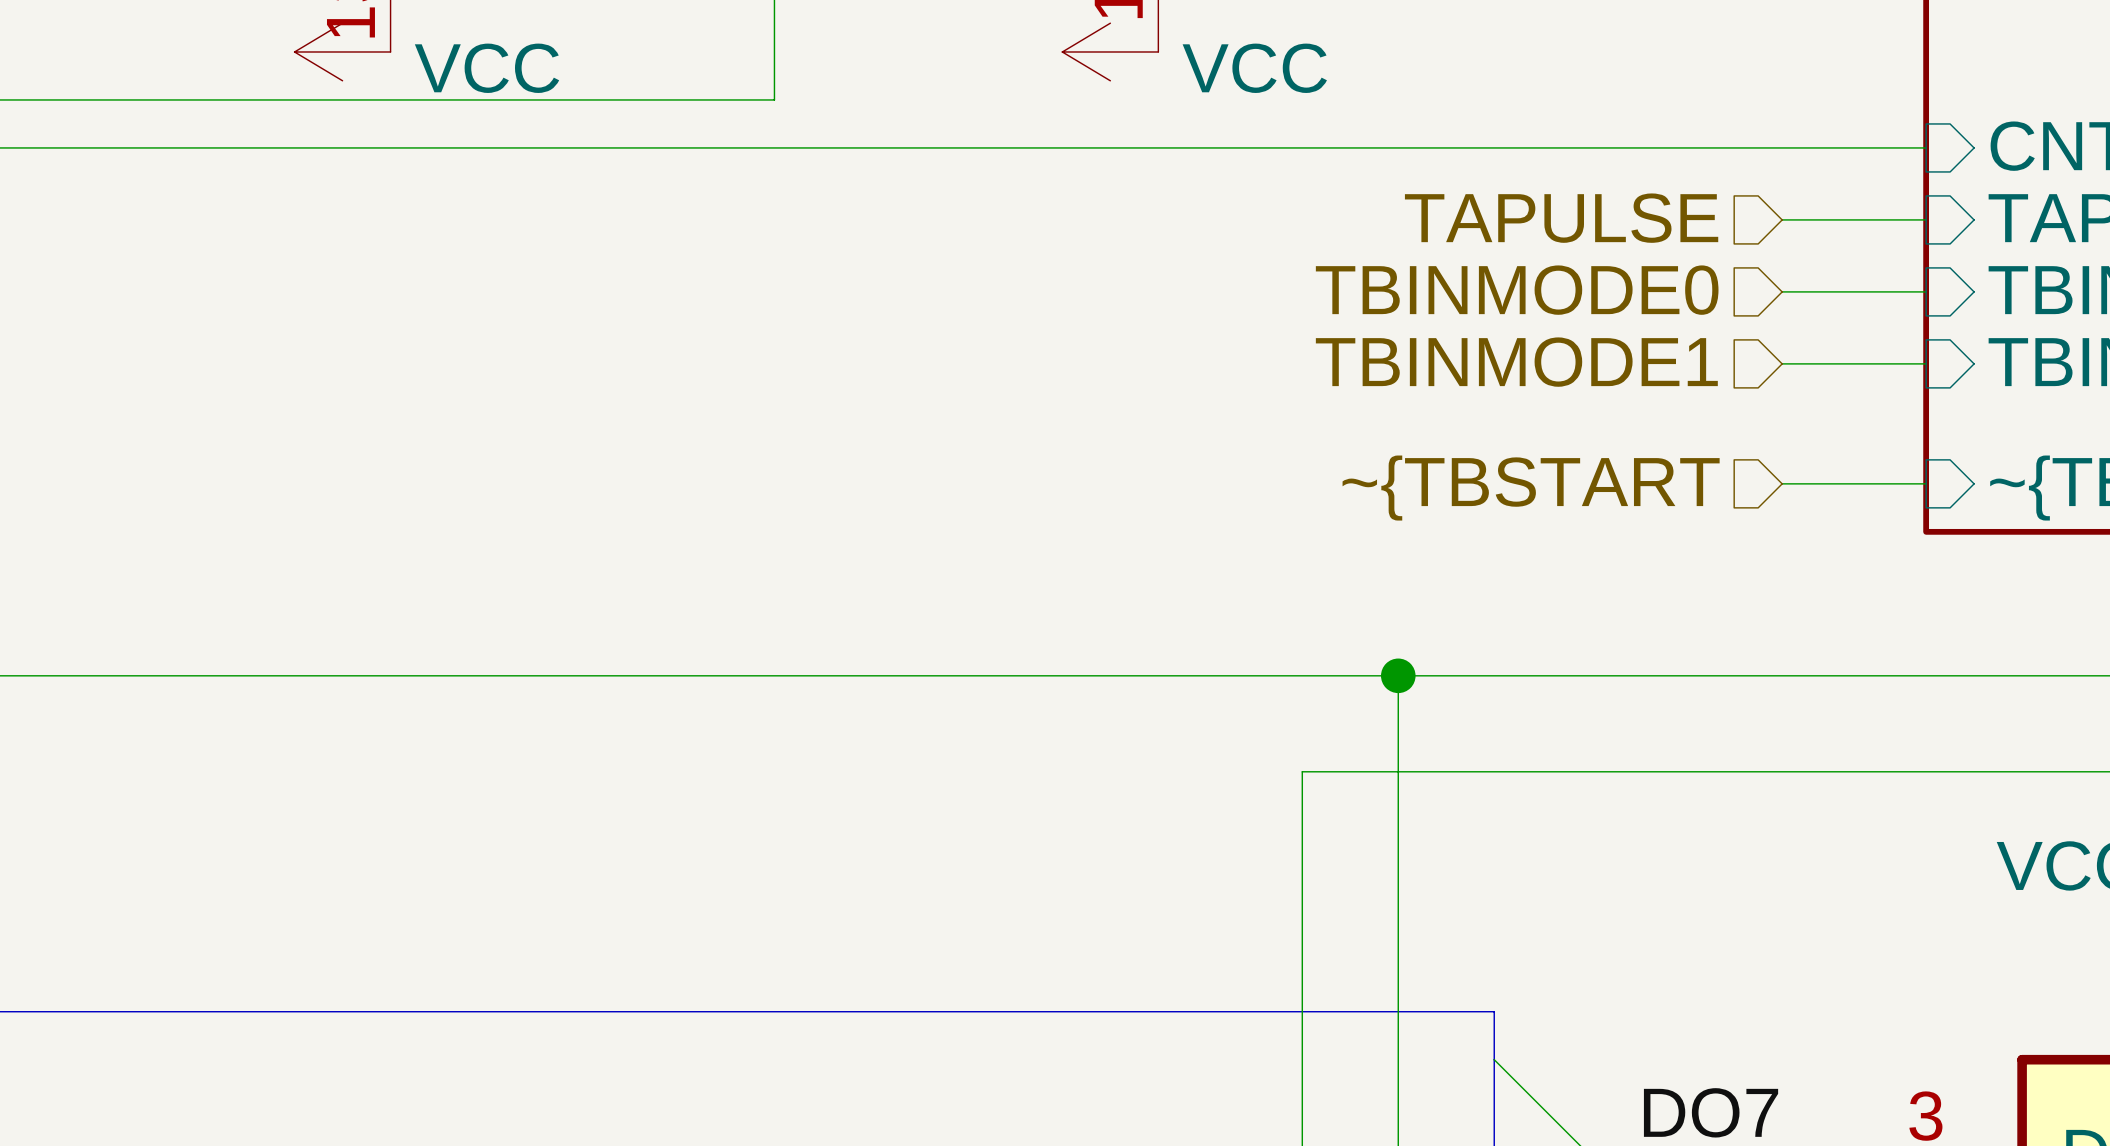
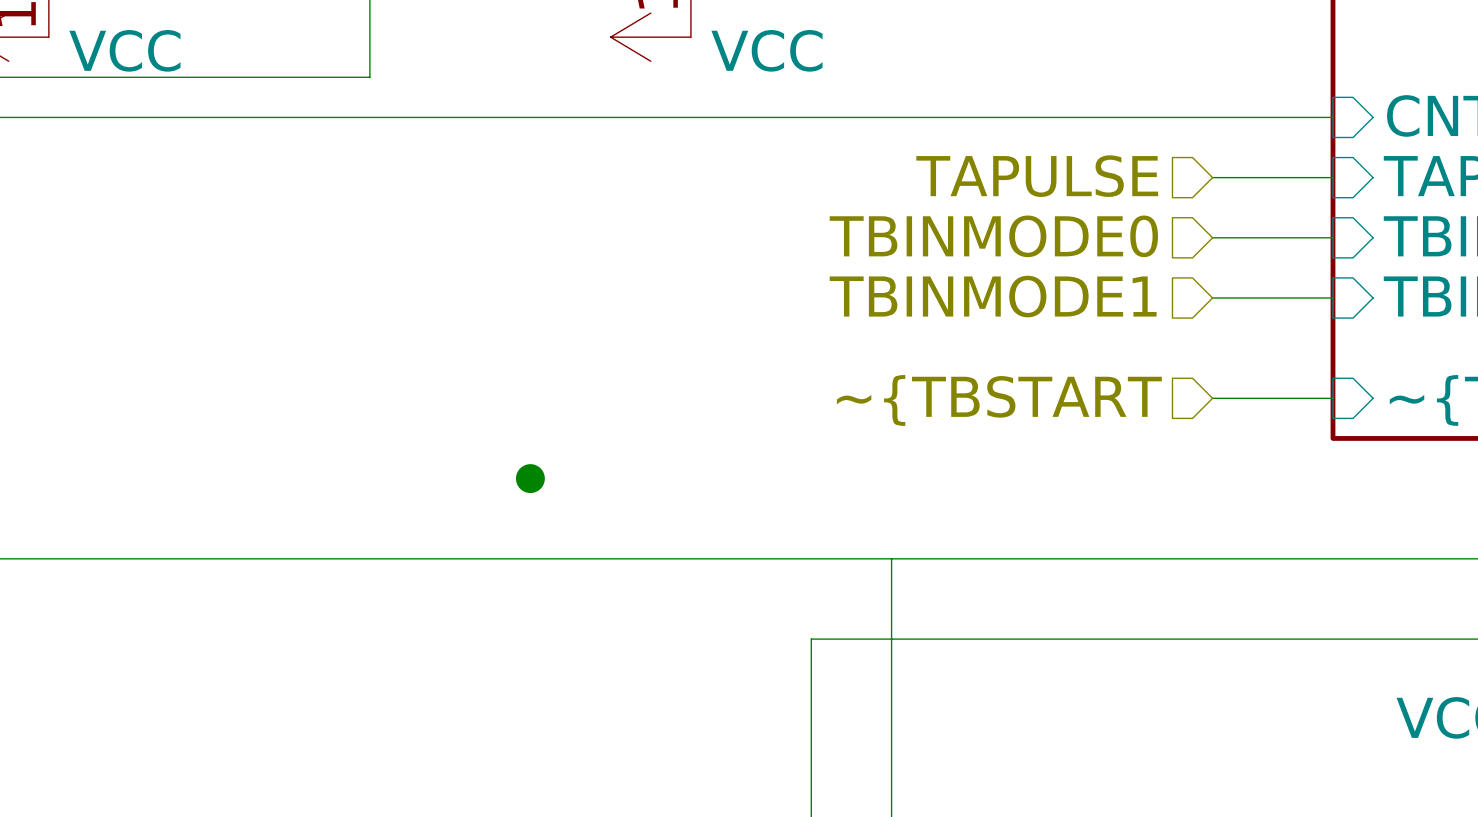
junction: none -> (530, 478)
junction: (1398, 675) -> none

